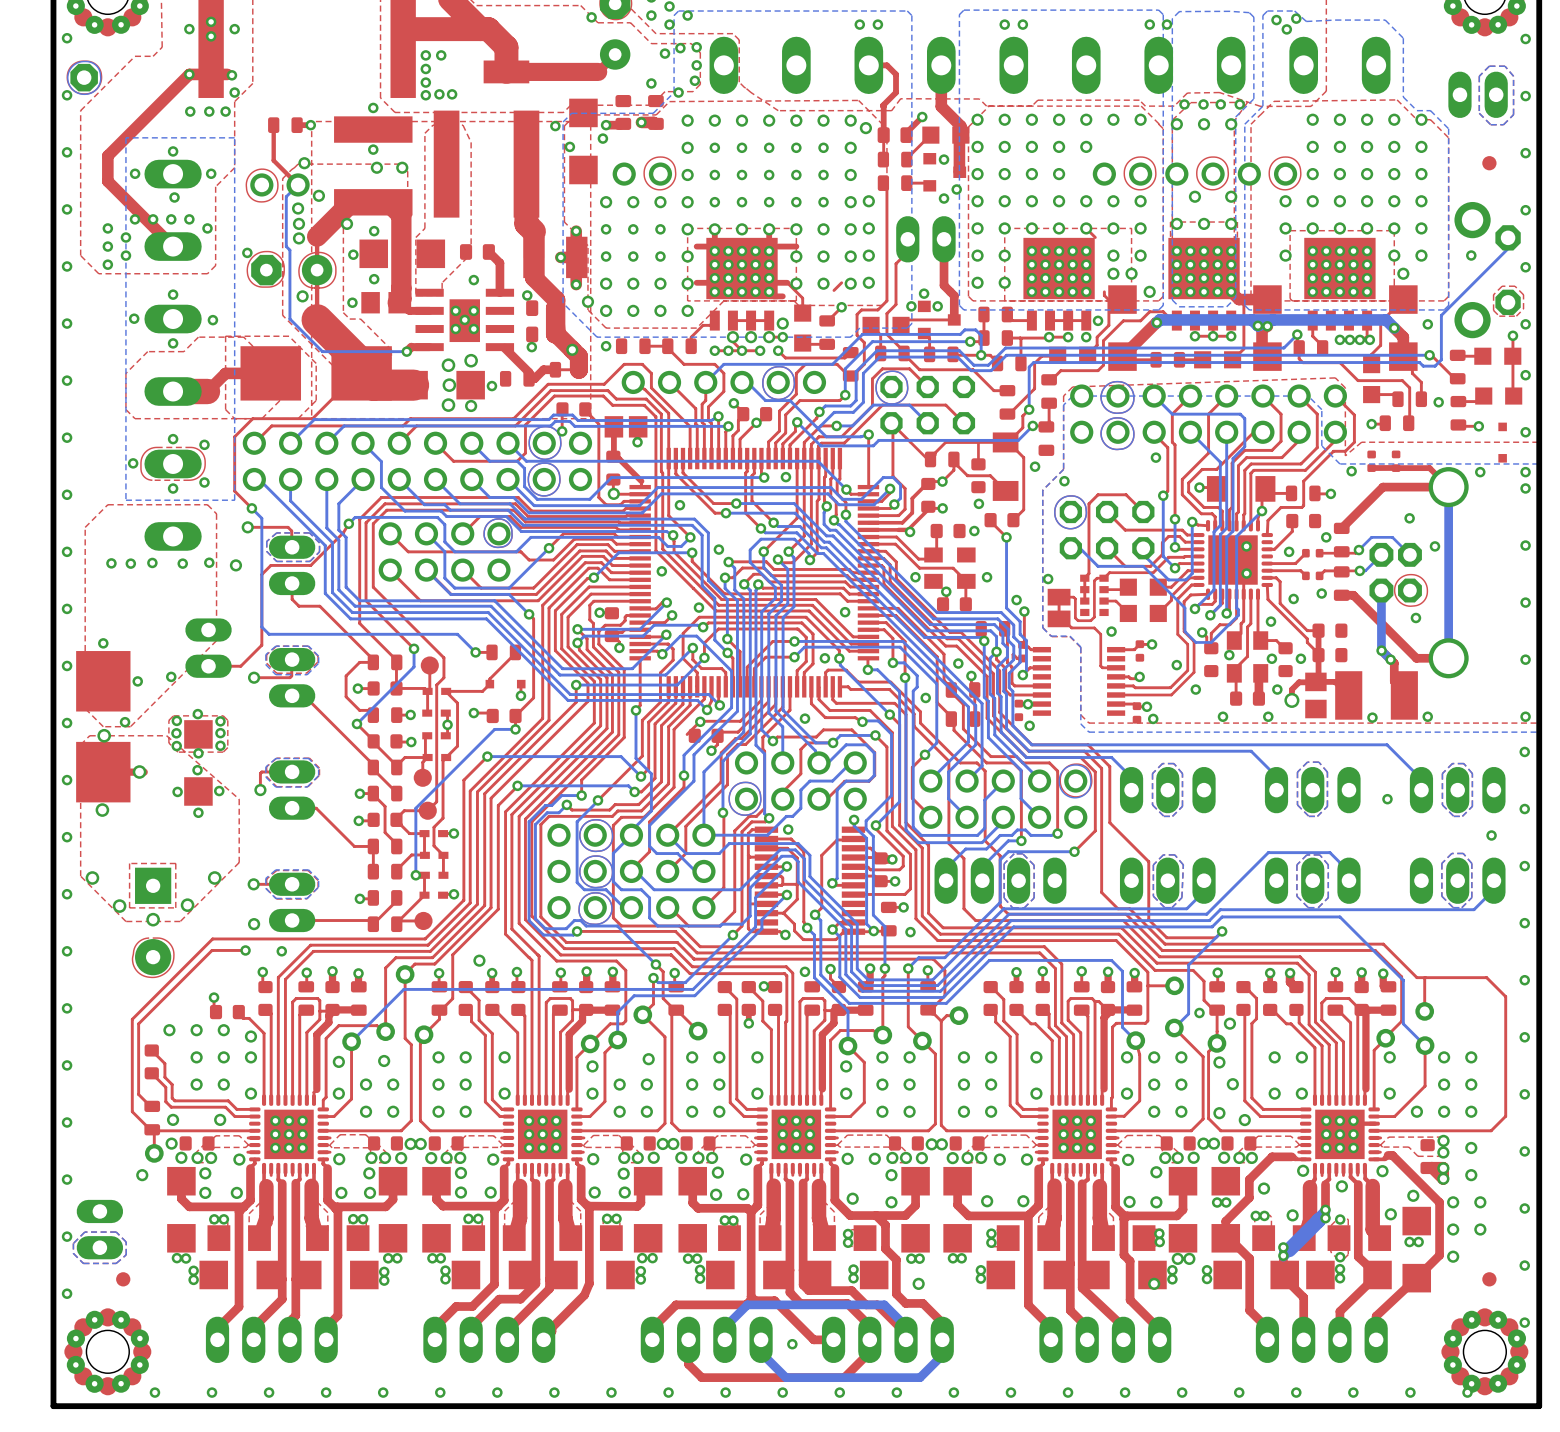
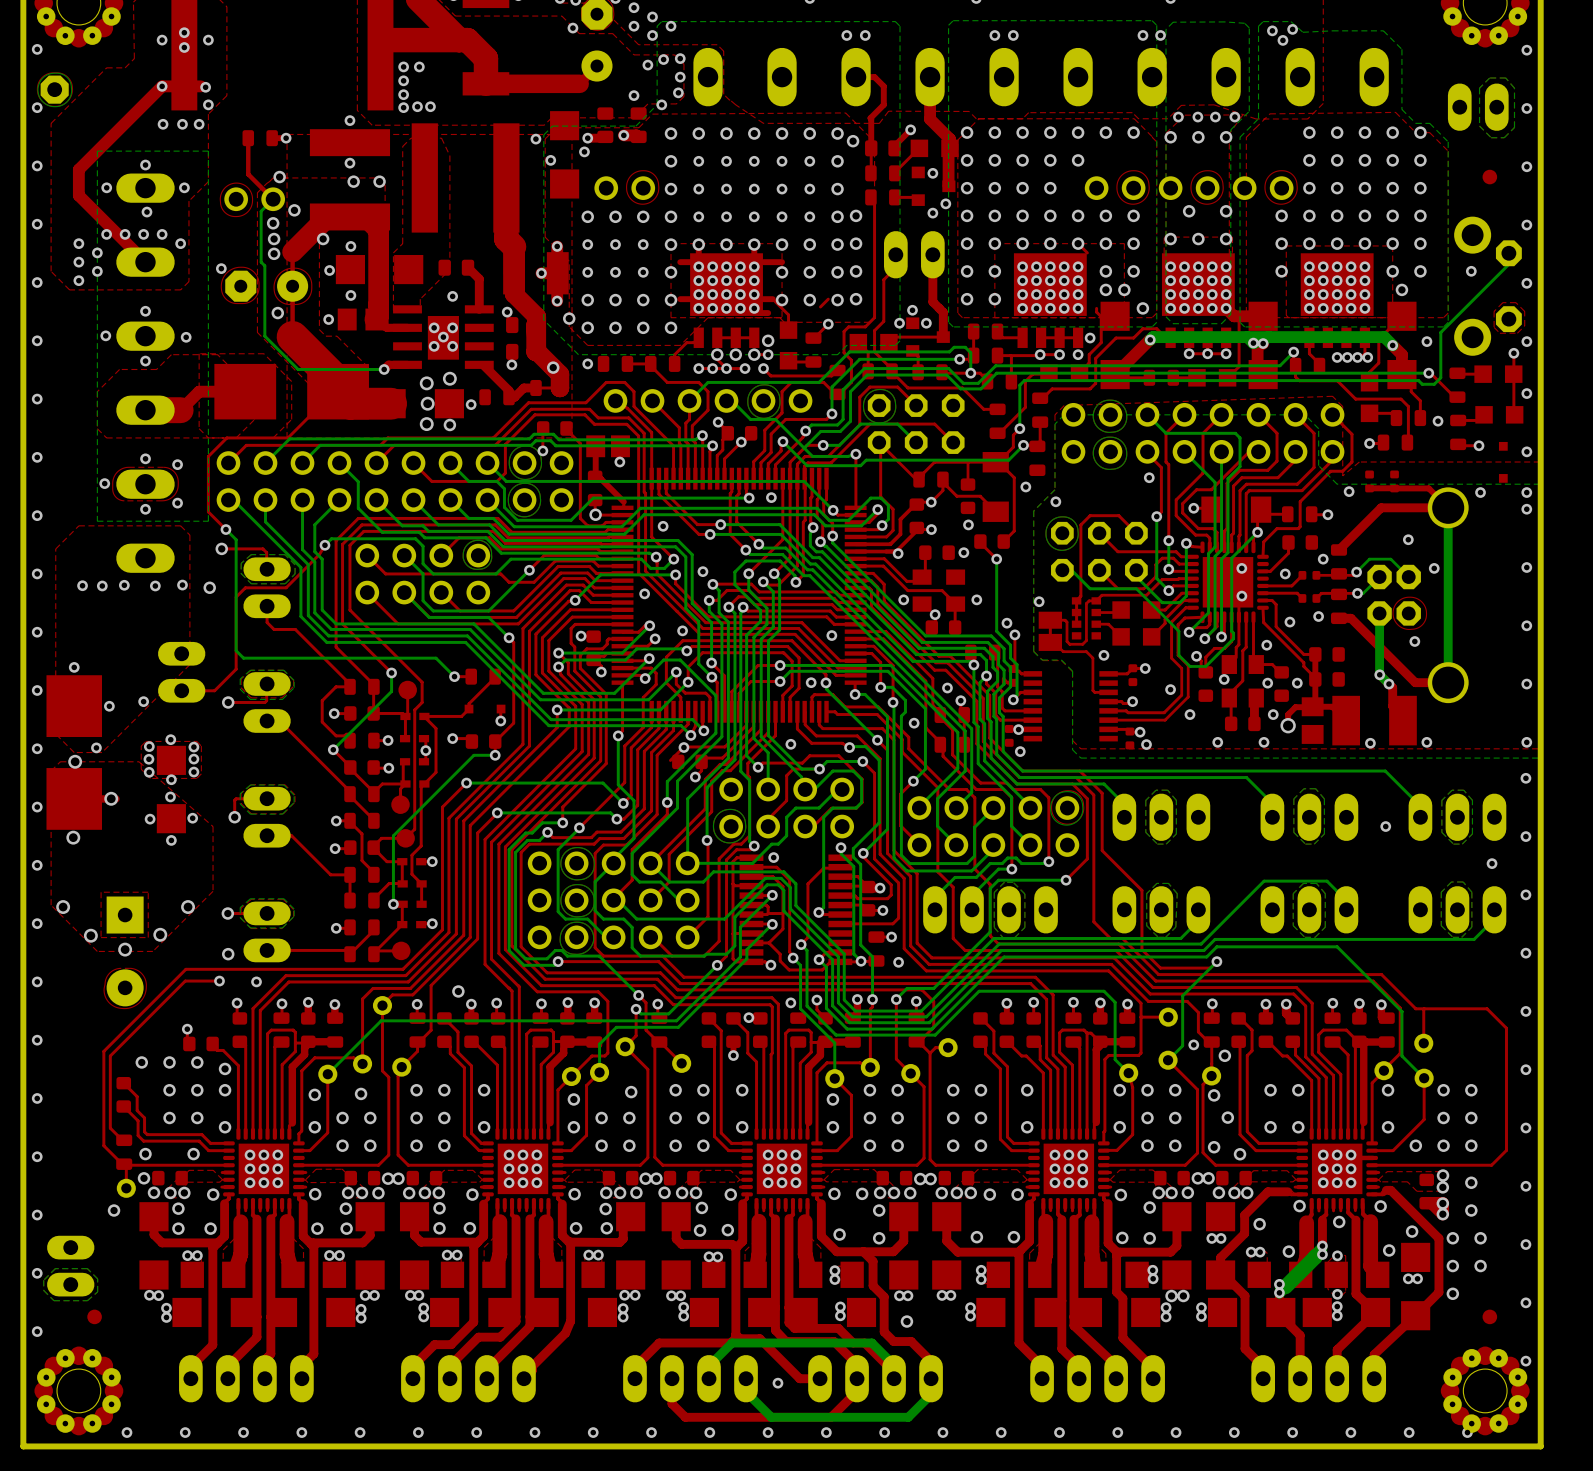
via: (1154, 1283) -> none

